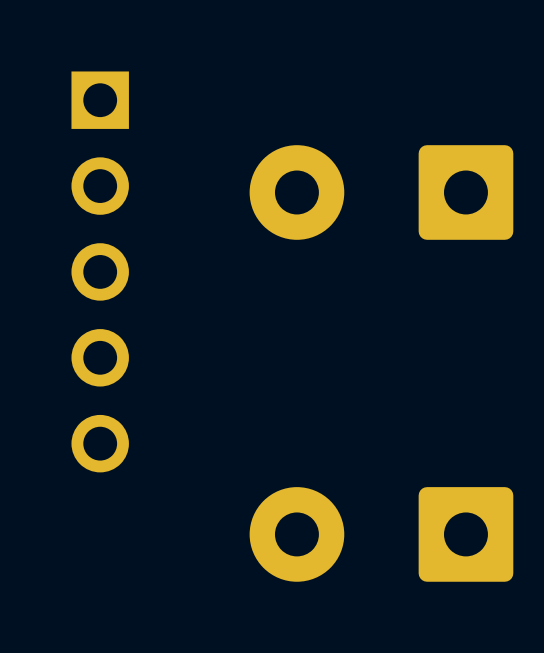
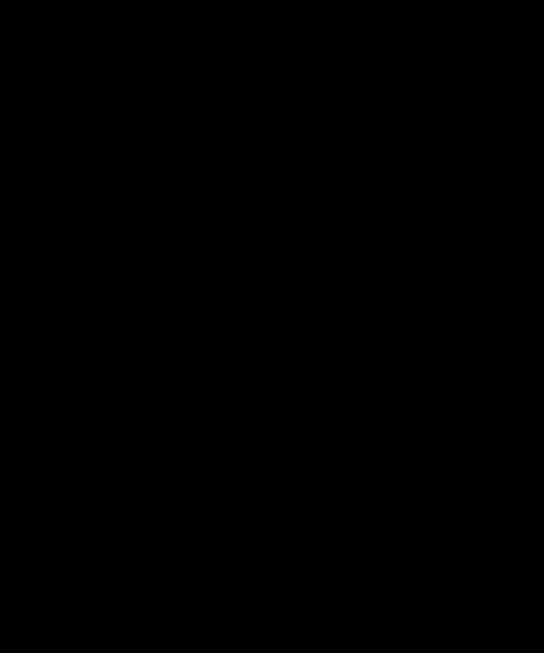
part: (381, 192) -> none
part: (100, 271) -> none
part: (381, 534) -> none

